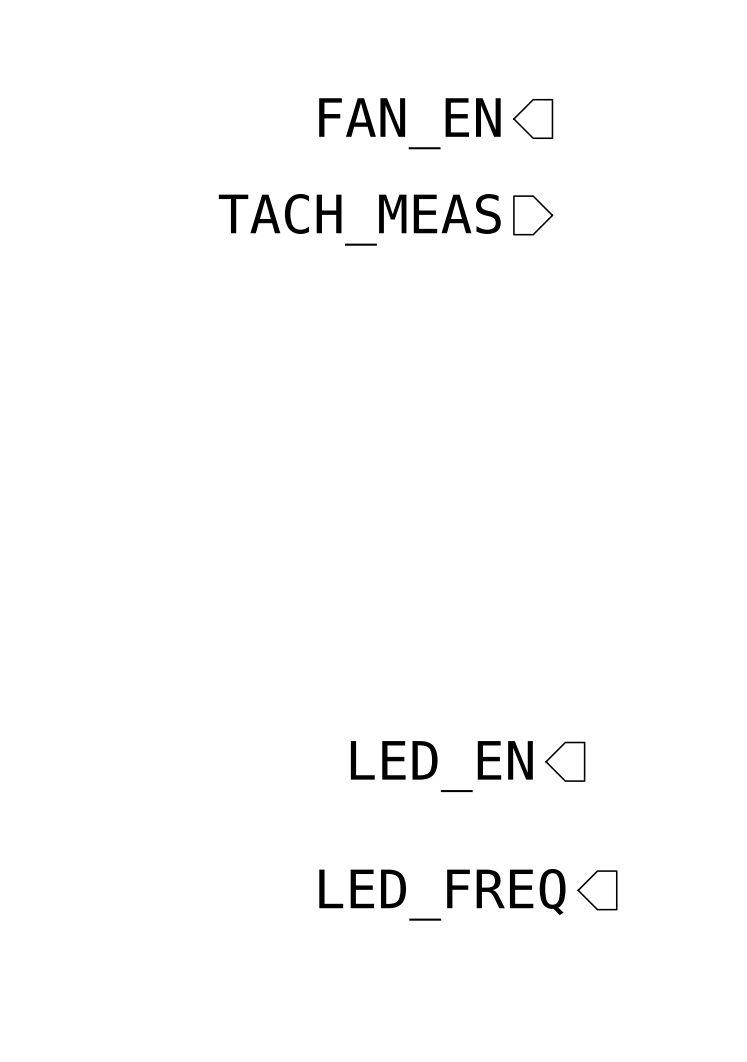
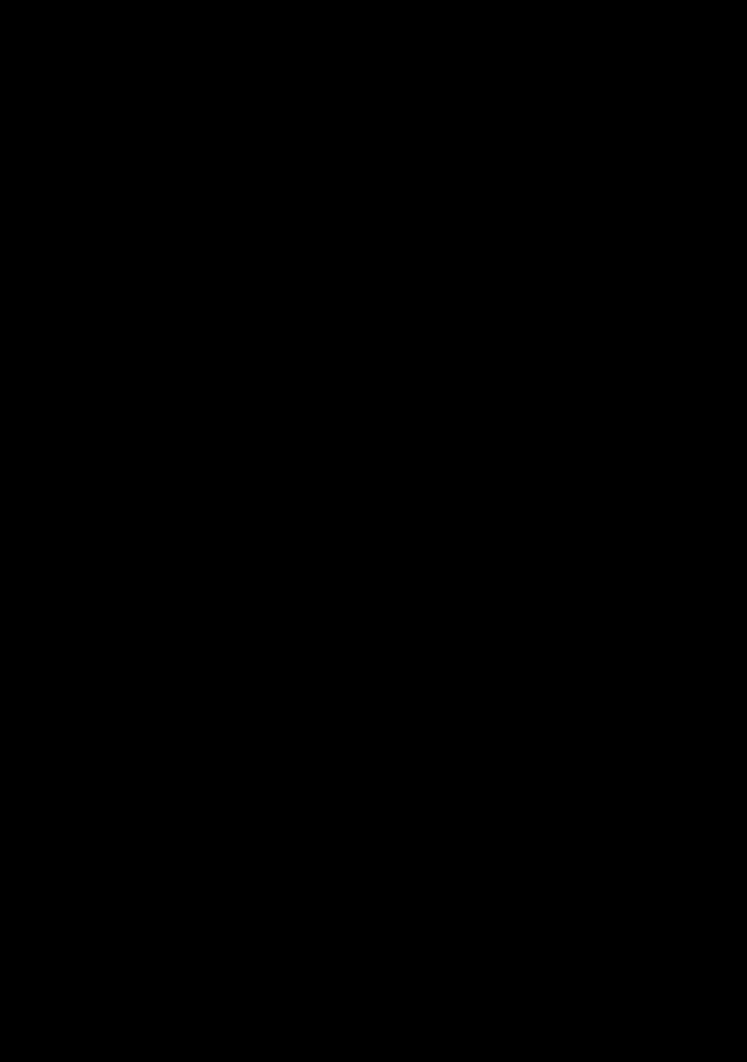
hierarchical label: FAN_EN (409, 123) -> none
hierarchical label: TACH_MEAS (359, 219) -> none
hierarchical label: LED_EN (441, 766) -> none
hierarchical label: LED_FREQ (442, 894) -> none

